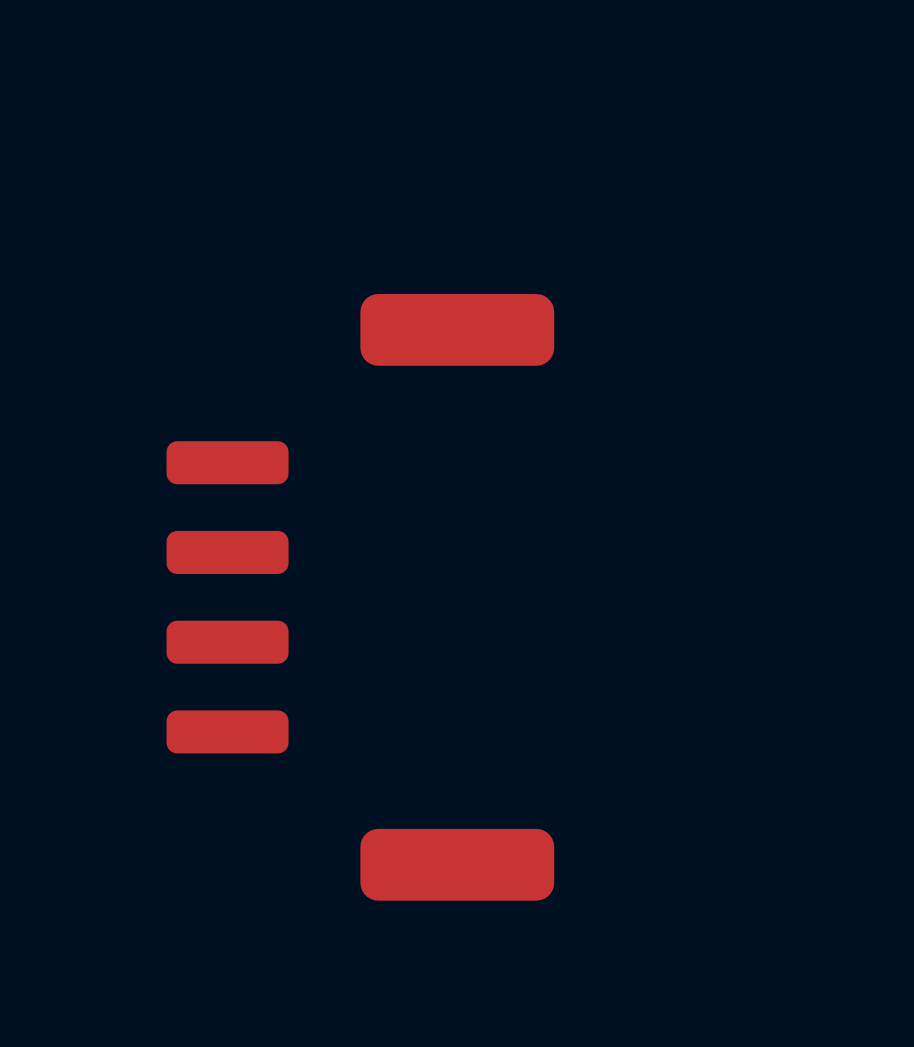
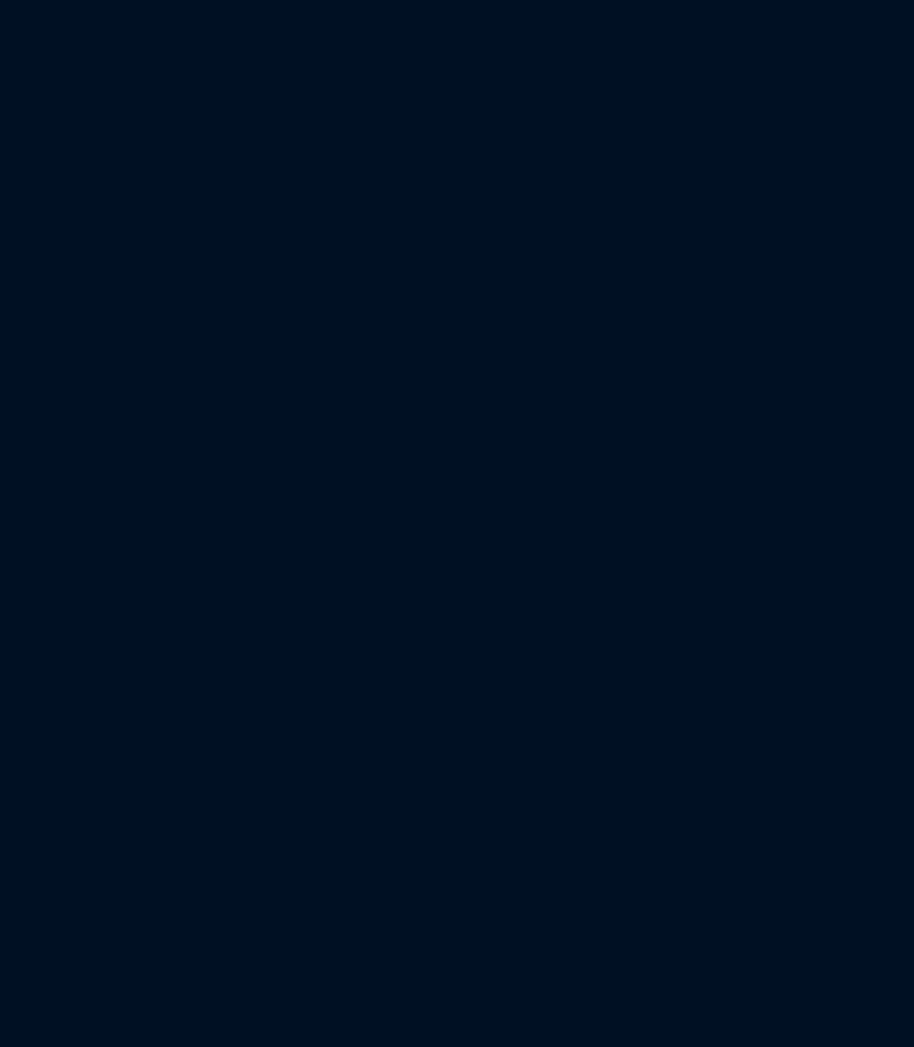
part: (360, 597) -> none

